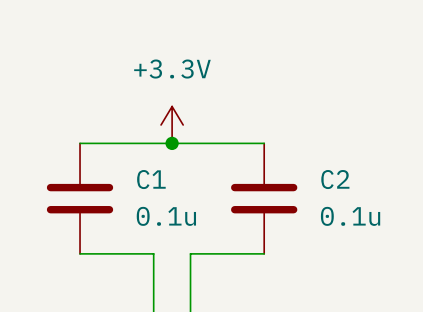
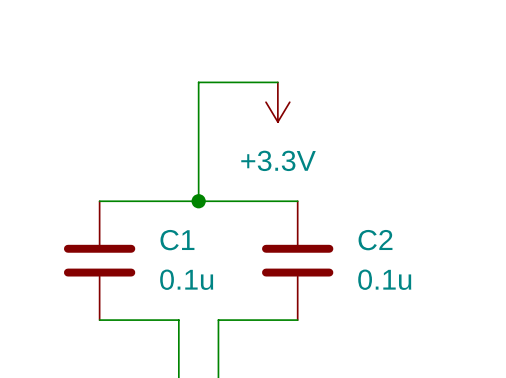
wire: none -> (277, 82) (198, 82) (198, 201)
power symbol rotation: 0° (172, 124) -> 180° (277, 102)
power symbol position: +3.3V (172, 124) -> +3.3V (277, 102)

